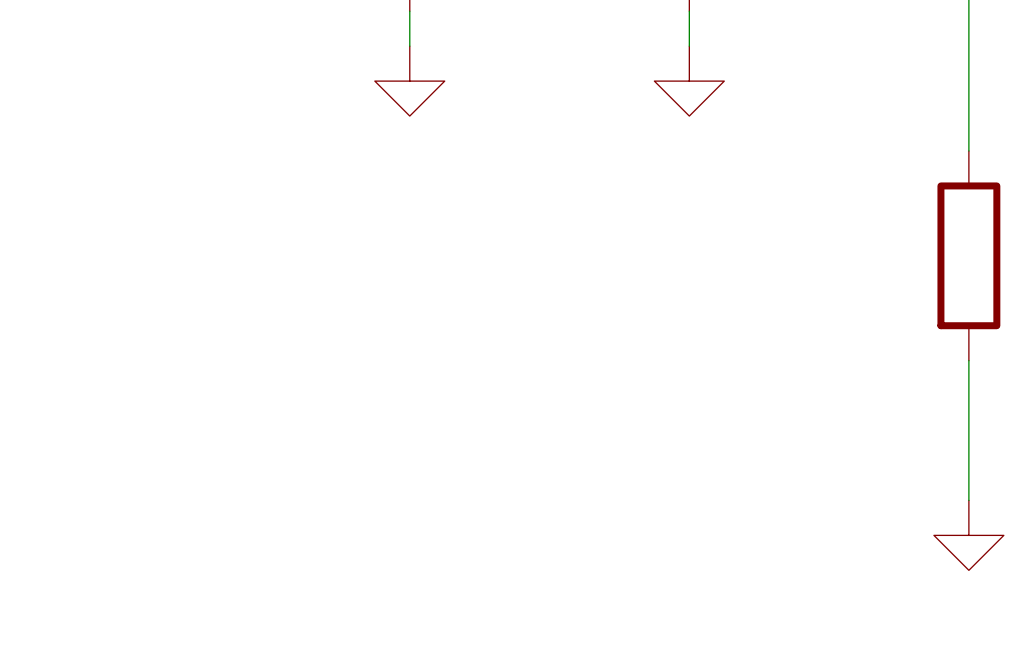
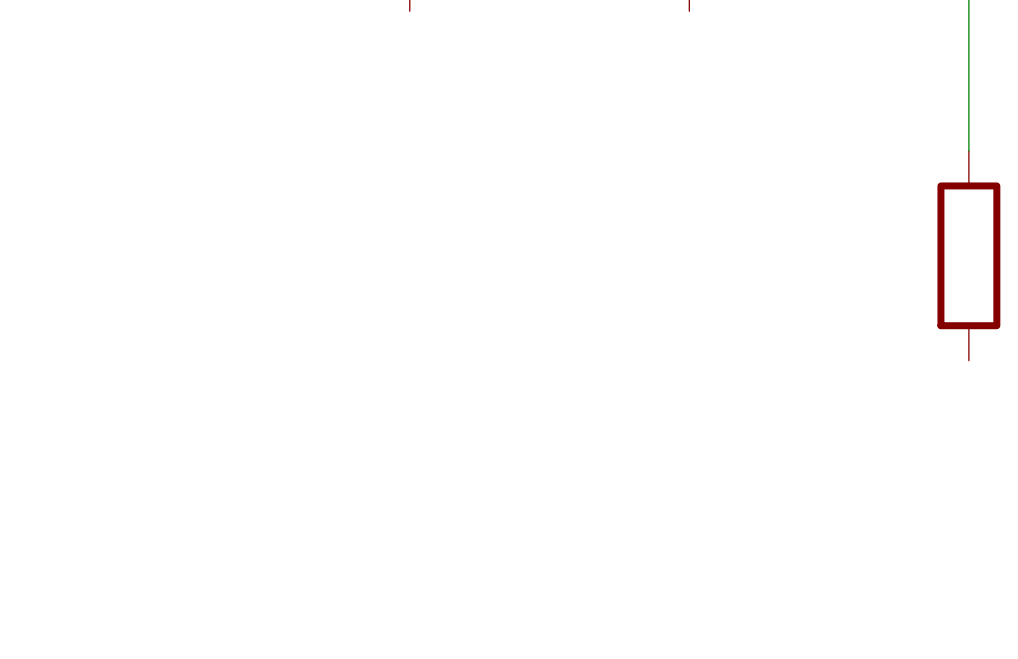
wire: (409, 11) (409, 46) -> none
wire: (689, 11) (689, 46) -> none
power symbol: (409, 81) -> none
power symbol: (689, 81) -> none
wire: (968, 360) (968, 500) -> none
power symbol: (968, 535) -> none

